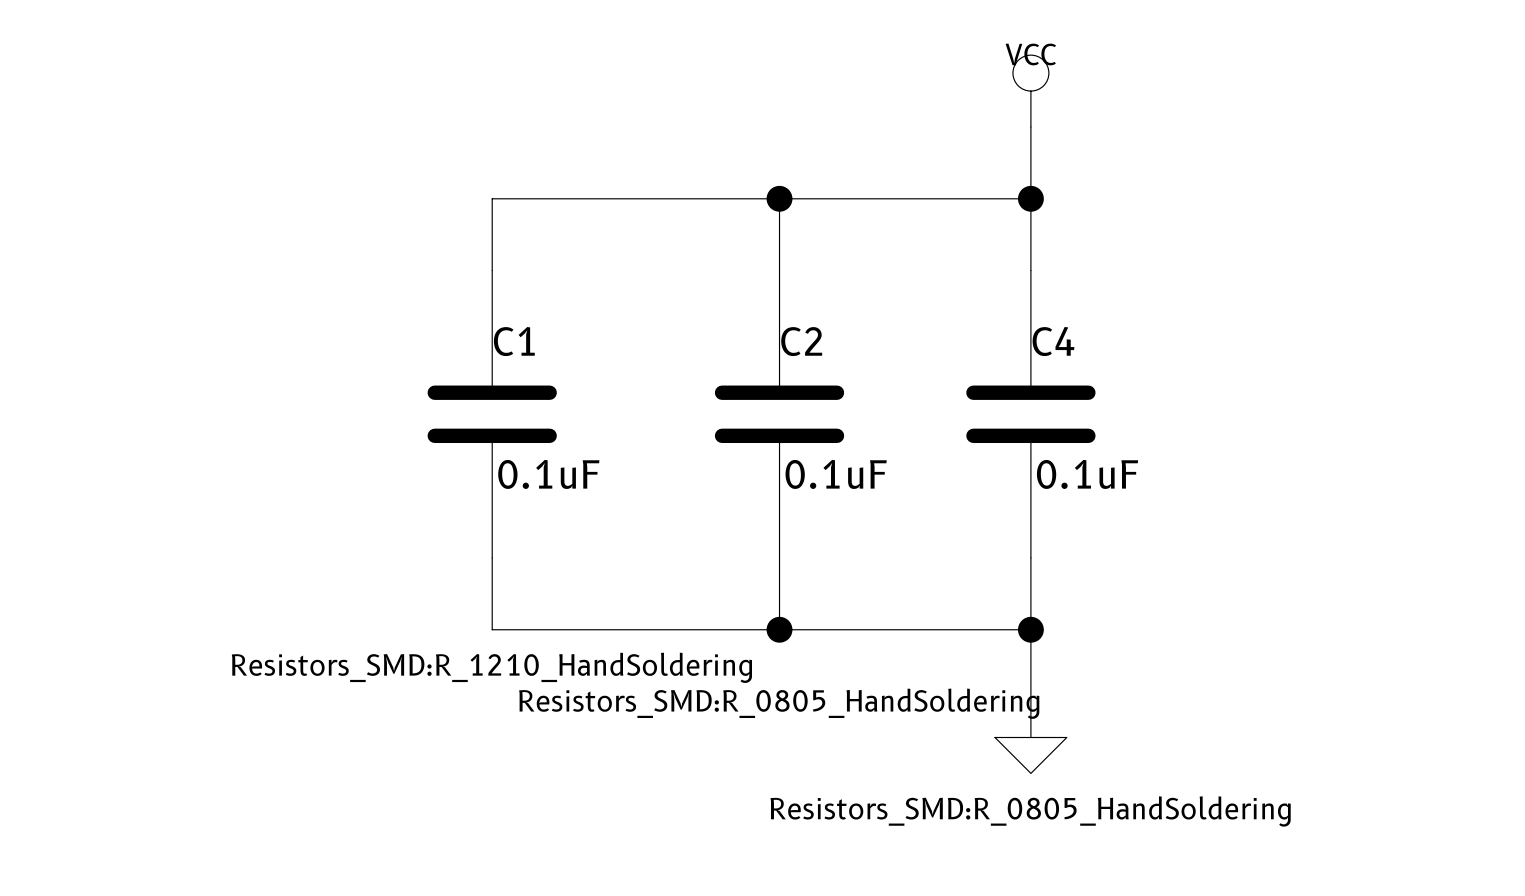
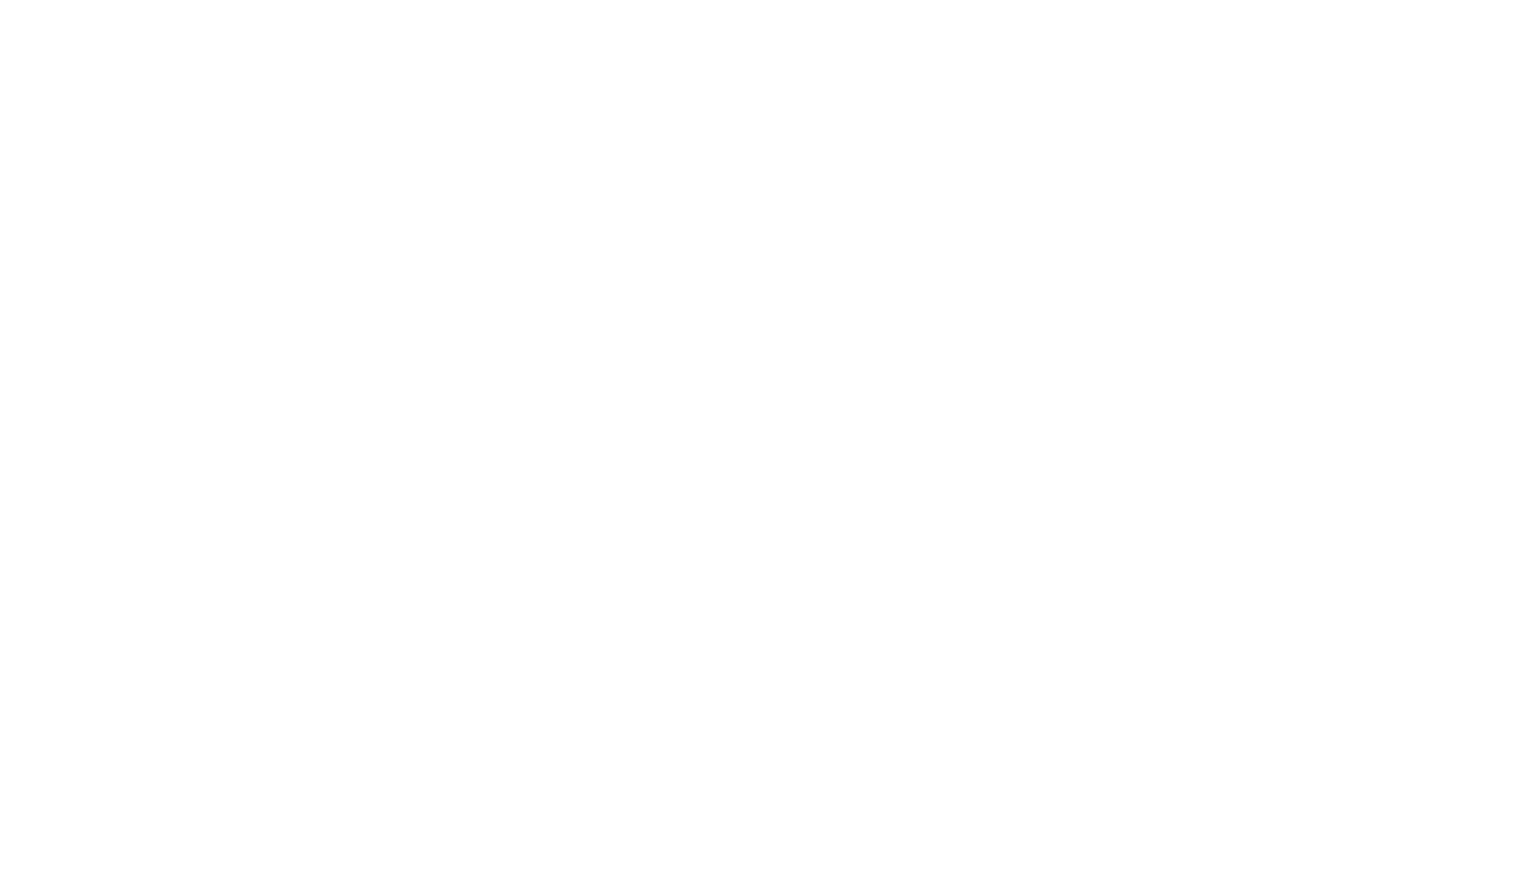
power symbol: VCC (1030, 91) -> none
wire: (1030, 126) (1030, 270) -> none
wire: (779, 198) (779, 270) -> none
junction: (779, 198) -> none
wire: (1030, 198) (492, 198) (492, 270) -> none
junction: (1030, 198) -> none
C1: 0.1uF (492, 414) -> none
C2: 0.1uF (779, 414) -> none
C4: 0.1uF (1030, 414) -> none
wire: (492, 557) (492, 629) (1030, 629) -> none
wire: (779, 557) (779, 629) -> none
wire: (1030, 557) (1030, 737) -> none
junction: (779, 629) -> none
junction: (1030, 629) -> none
power symbol: (1030, 755) -> none

